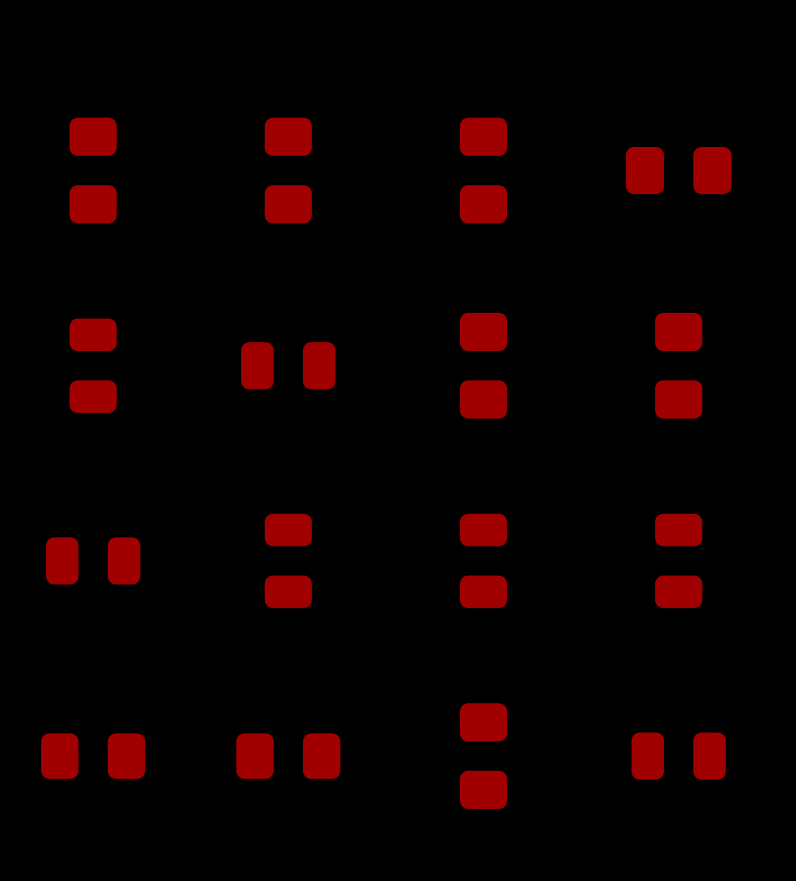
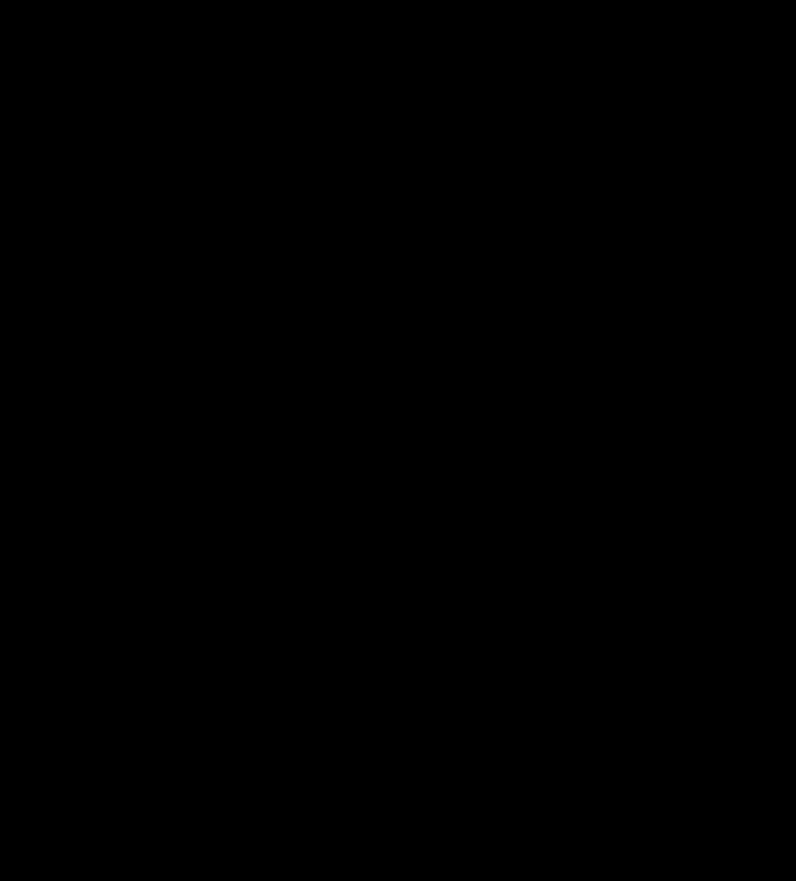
part: (93, 170) -> none
part: (288, 170) -> none
part: (483, 170) -> none
part: (678, 170) -> none
part: (93, 365) -> none
part: (288, 365) -> none
part: (483, 365) -> none
part: (678, 365) -> none
part: (93, 560) -> none
part: (288, 560) -> none
part: (483, 560) -> none
part: (678, 560) -> none
part: (93, 756) -> none
part: (288, 756) -> none
part: (483, 756) -> none
part: (678, 756) -> none

